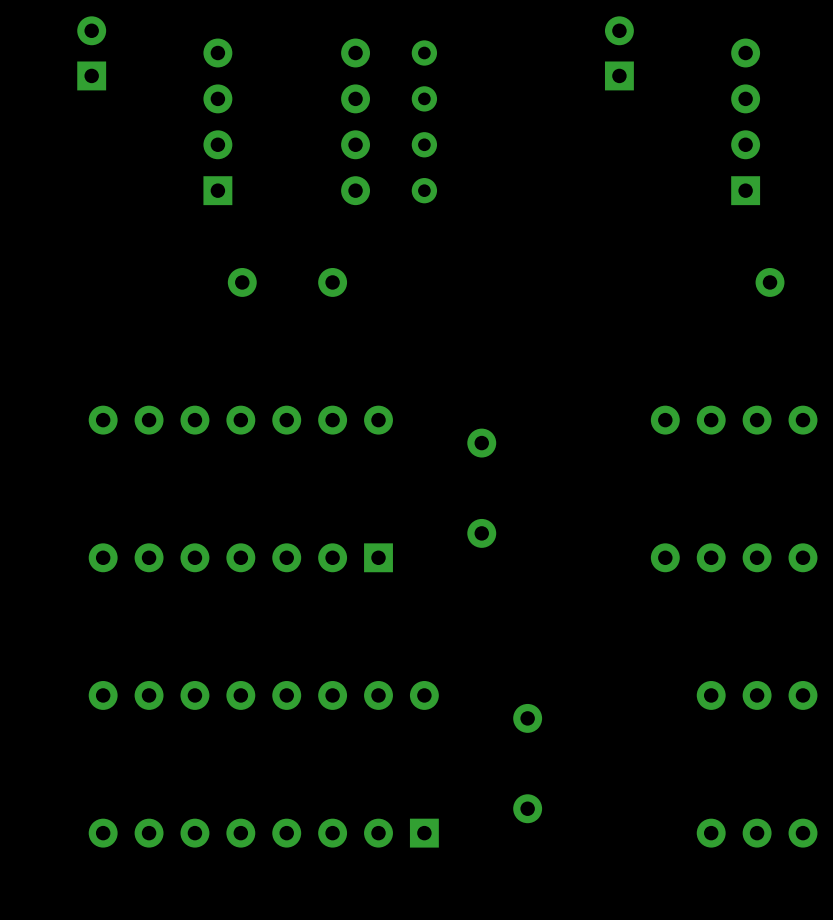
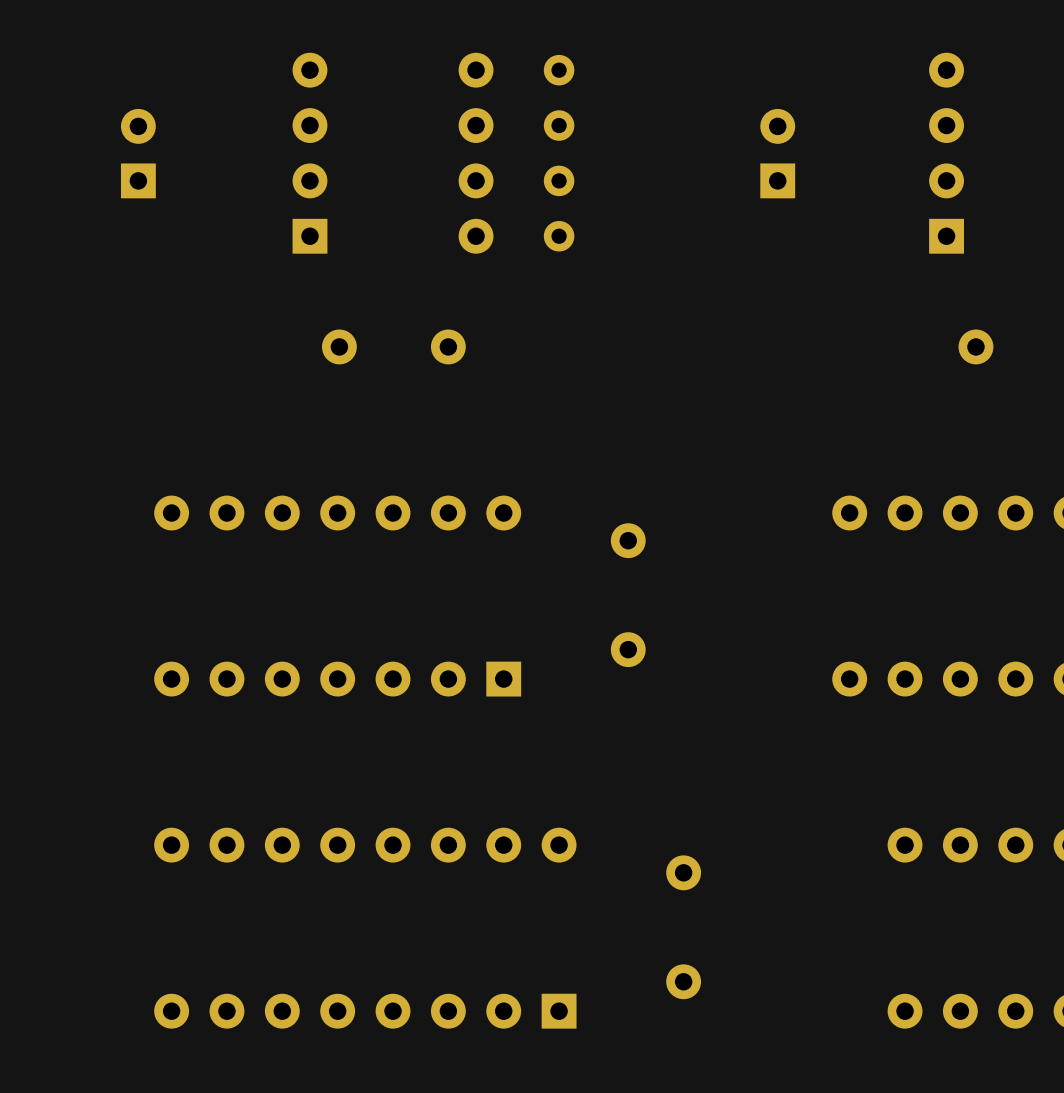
part position: (91, 53) -> (138, 153)
part position: (619, 53) -> (777, 153)

